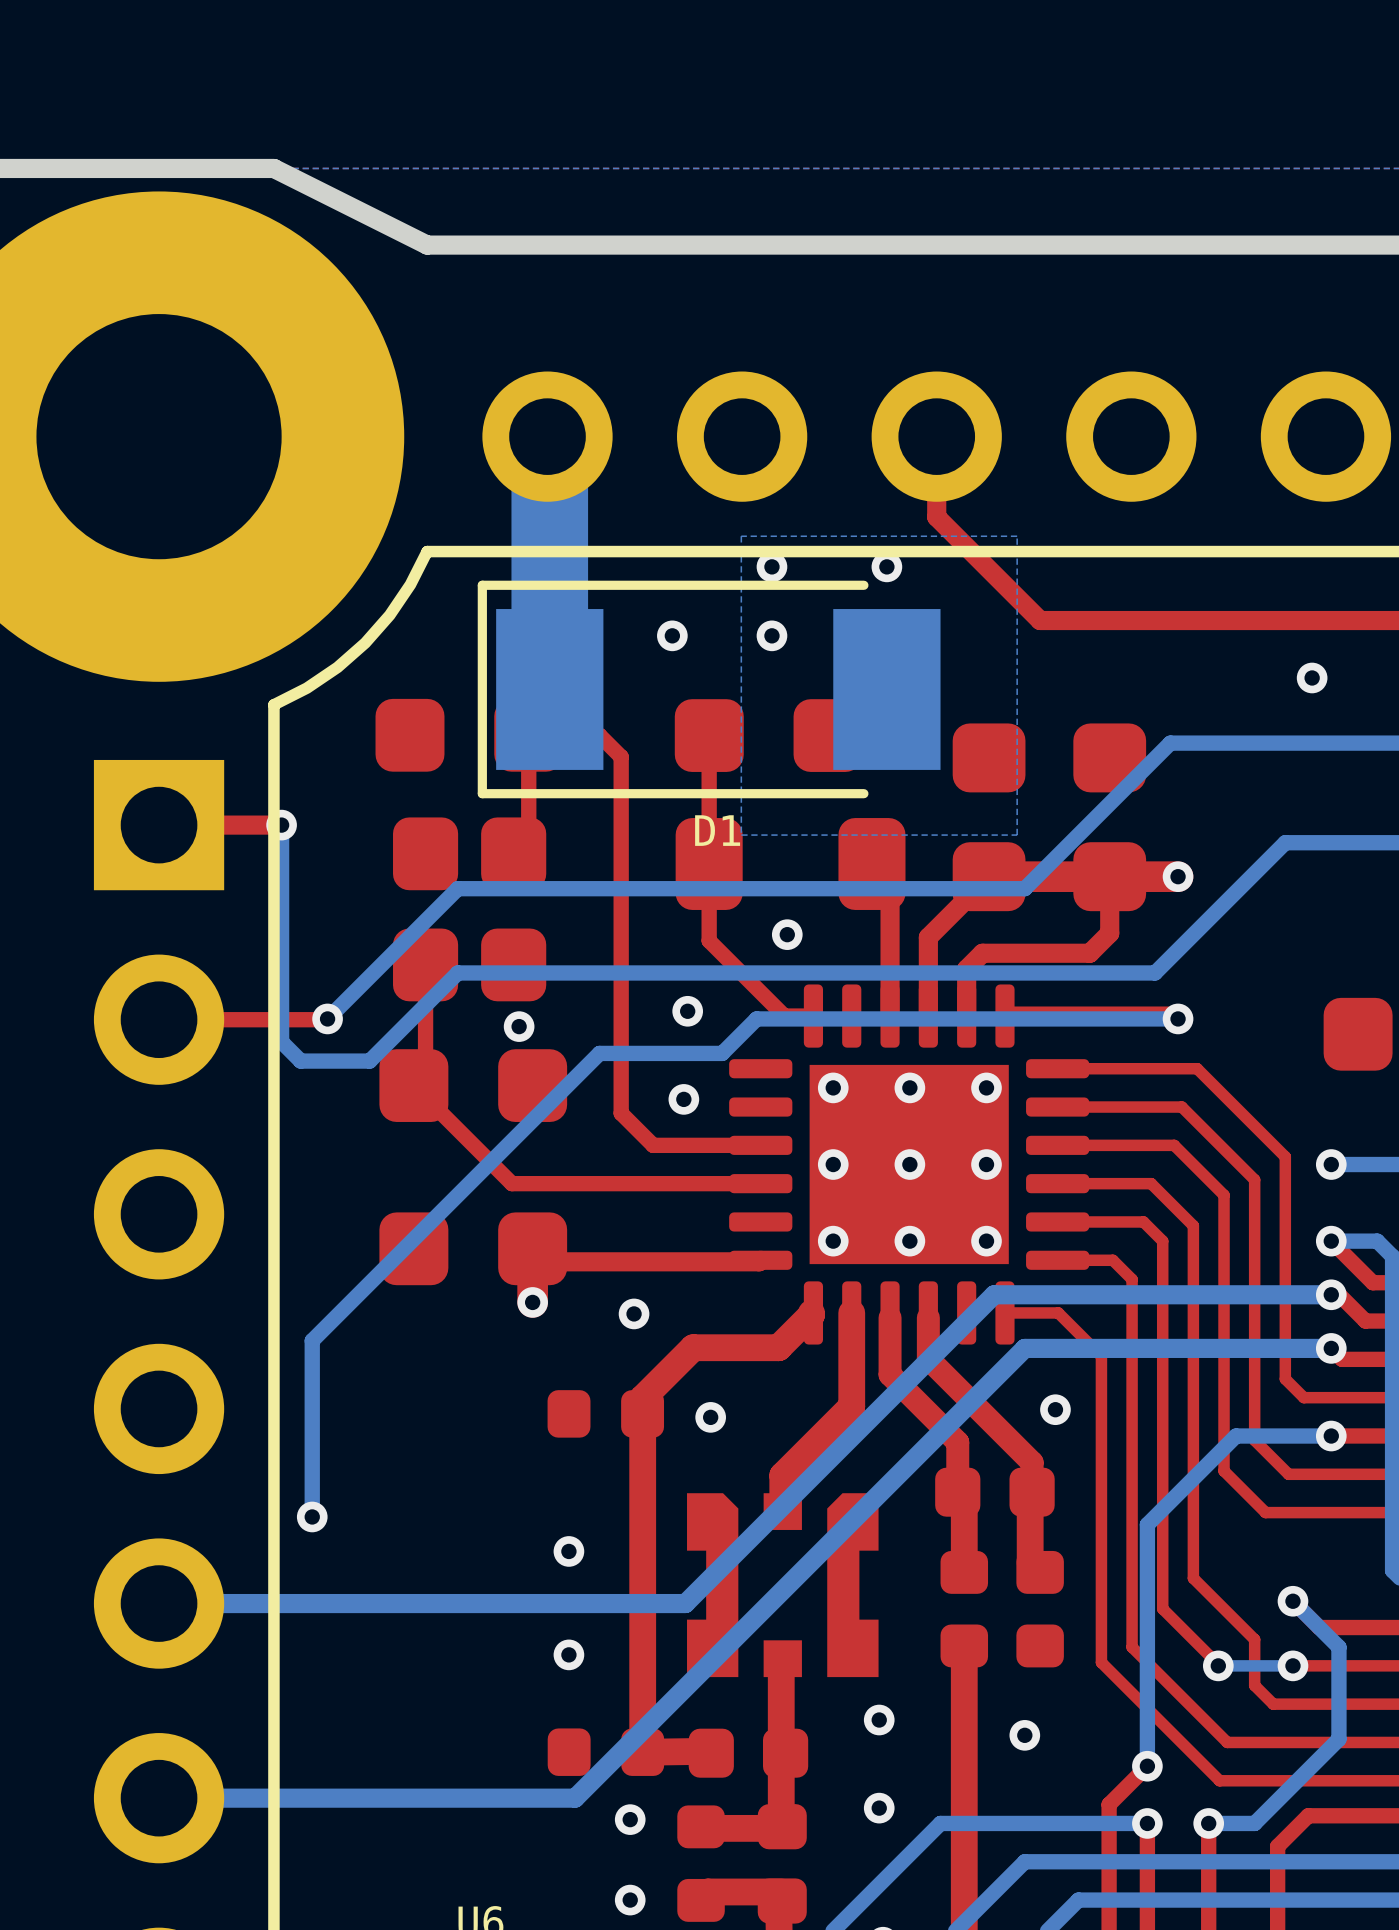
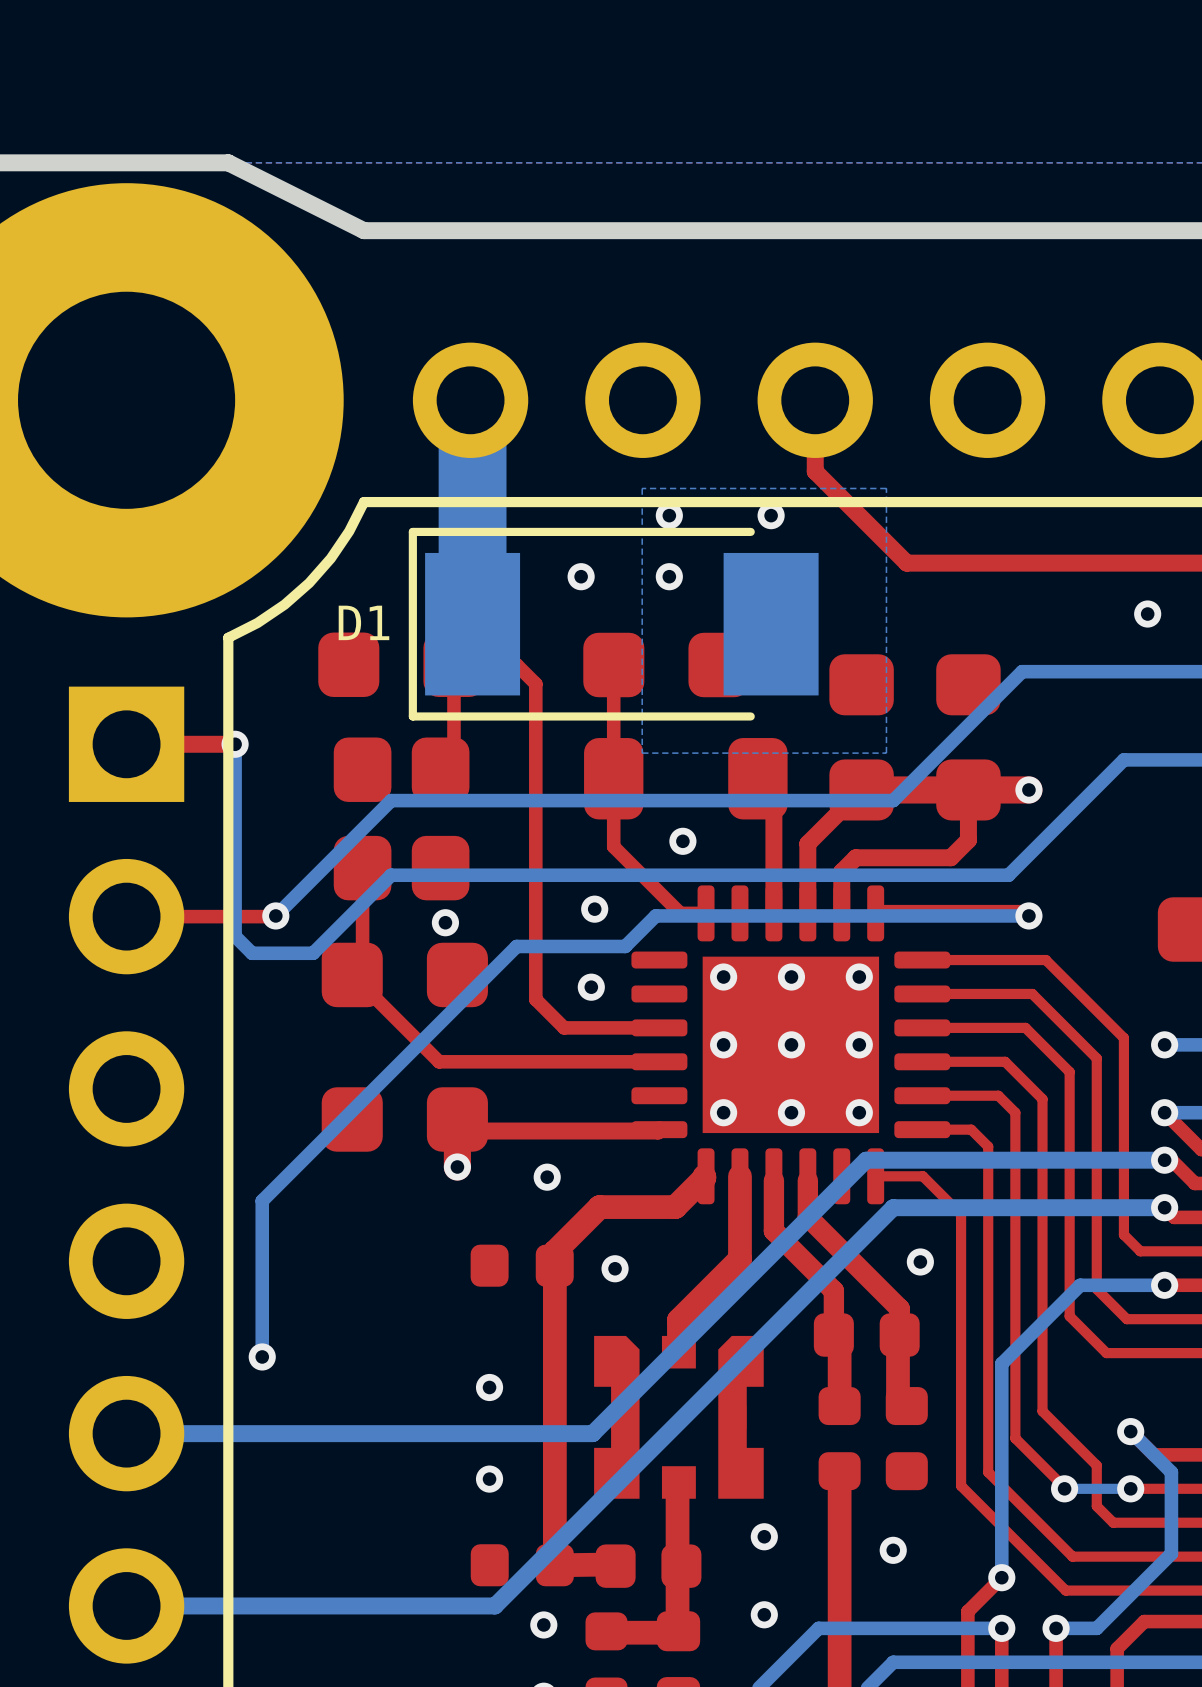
D1 name position: D1 (717, 830) -> D1 (363, 622)

